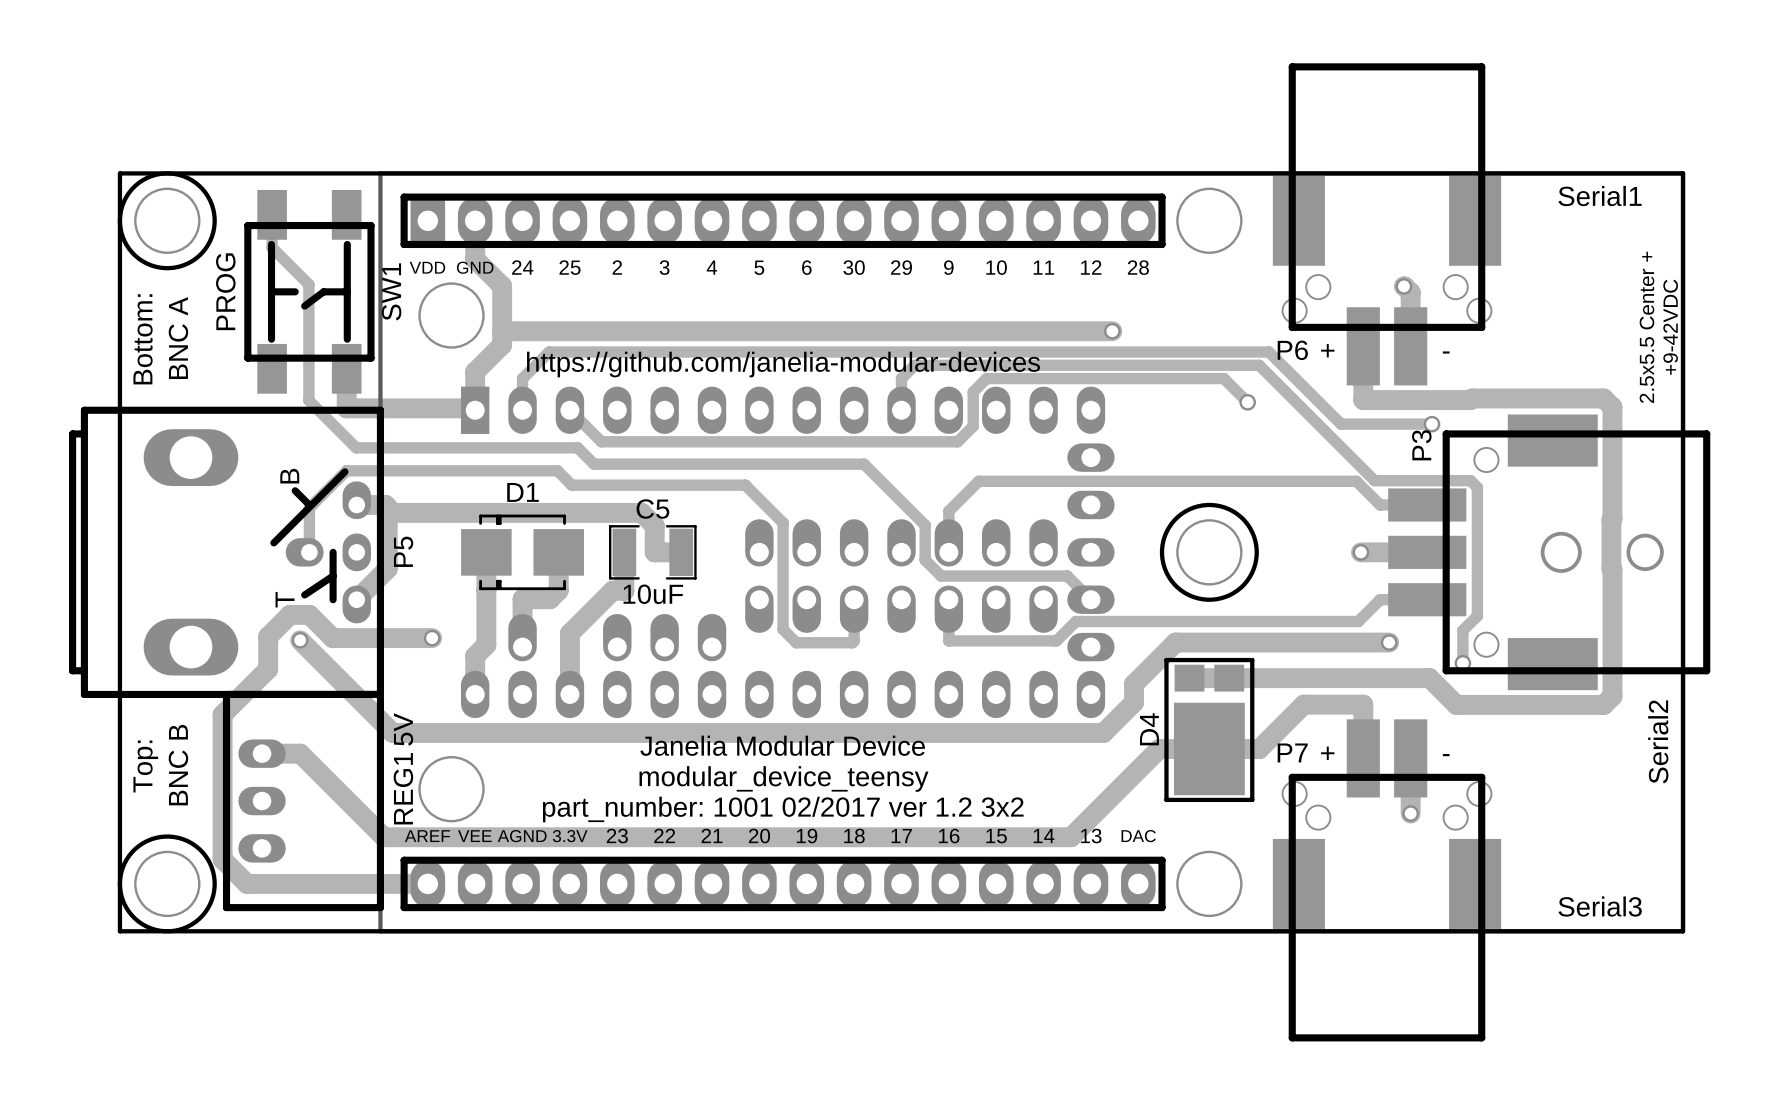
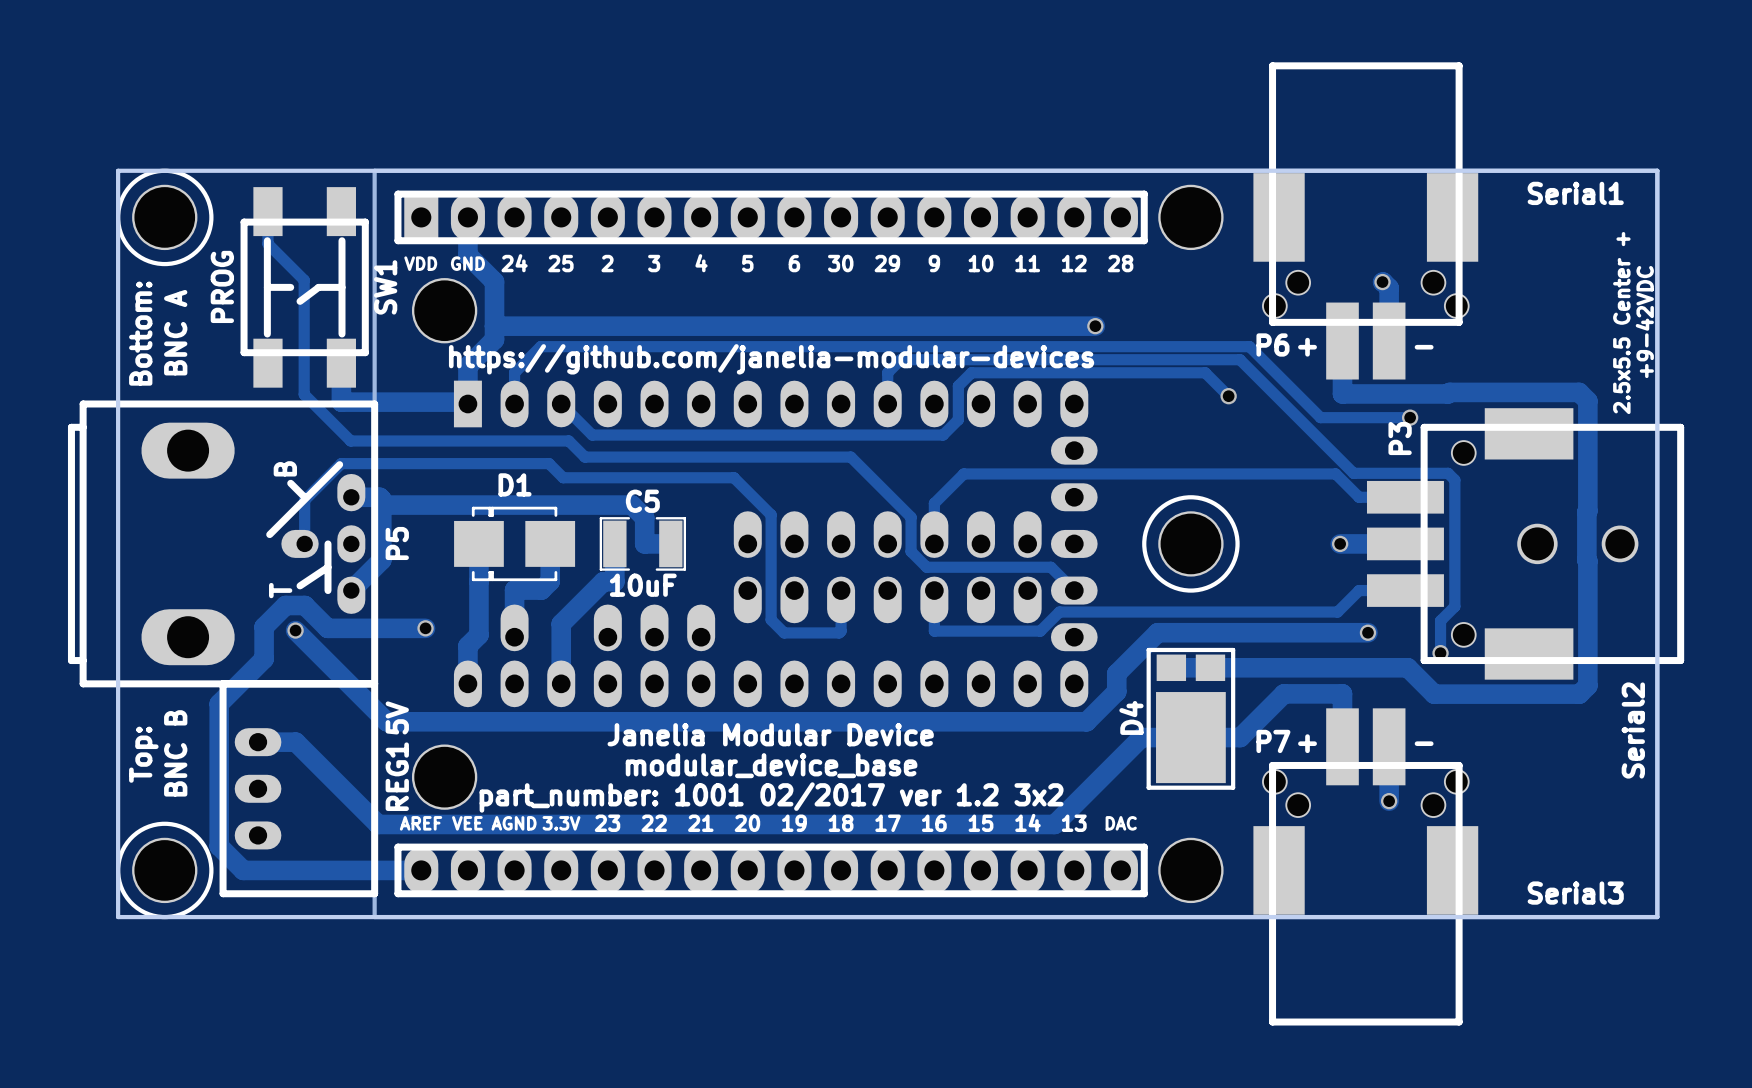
text: modular_device_teensy (783, 778) -> modular_device_base (771, 765)

